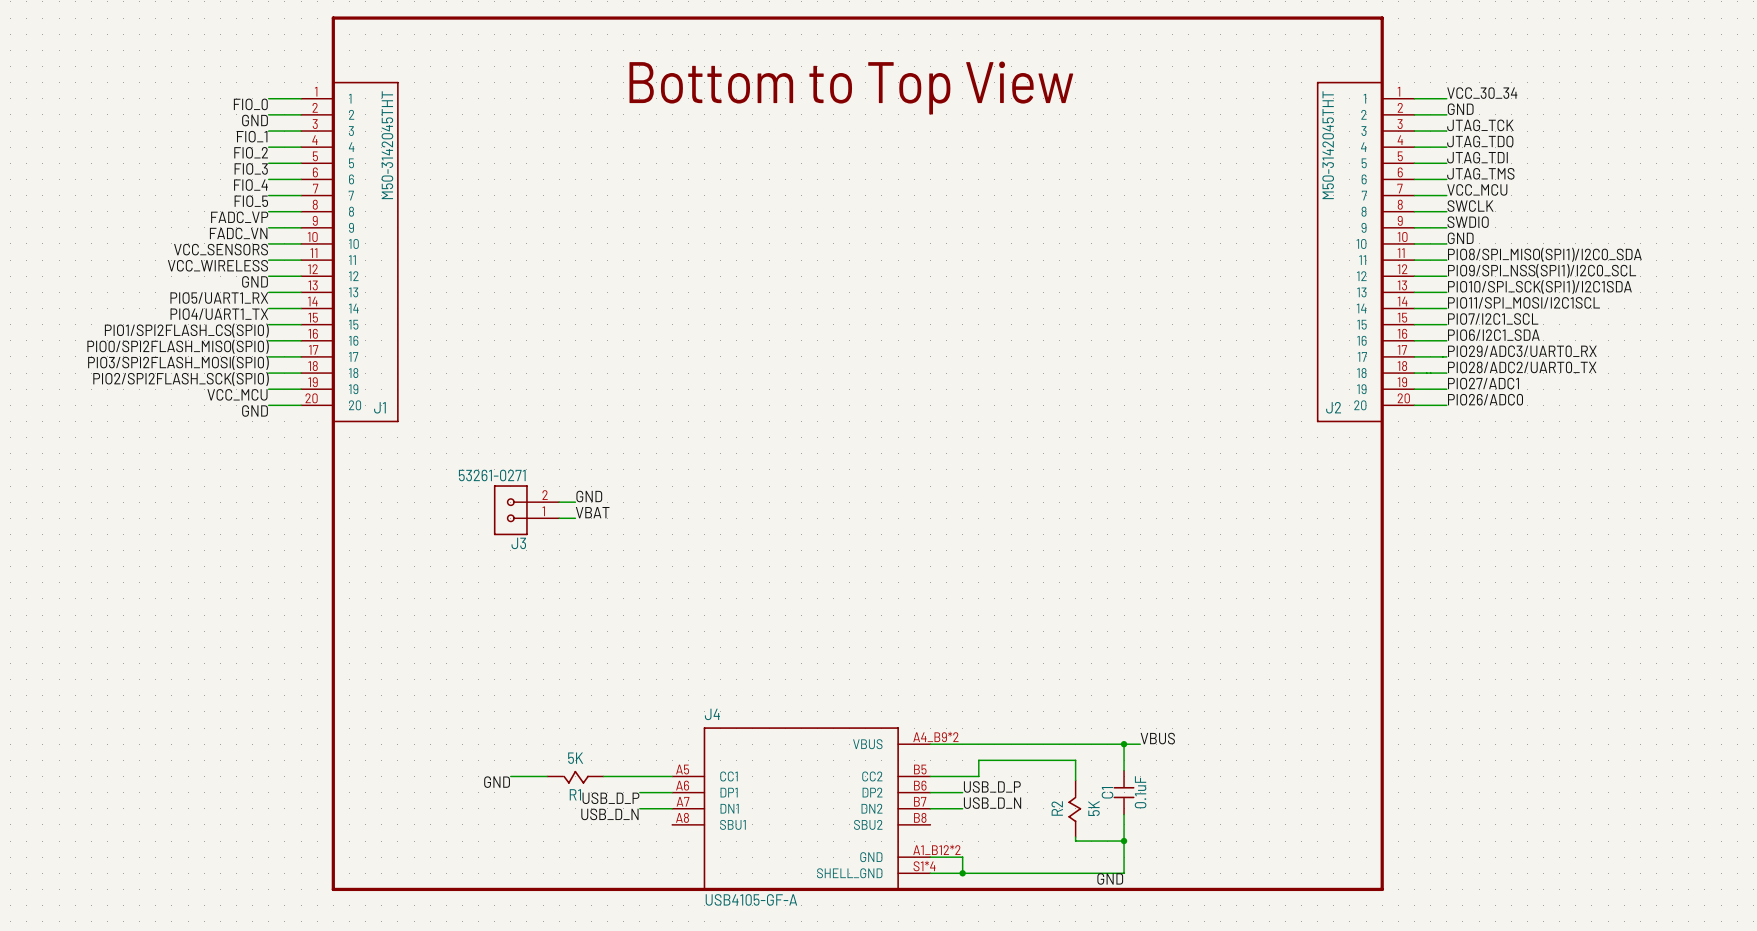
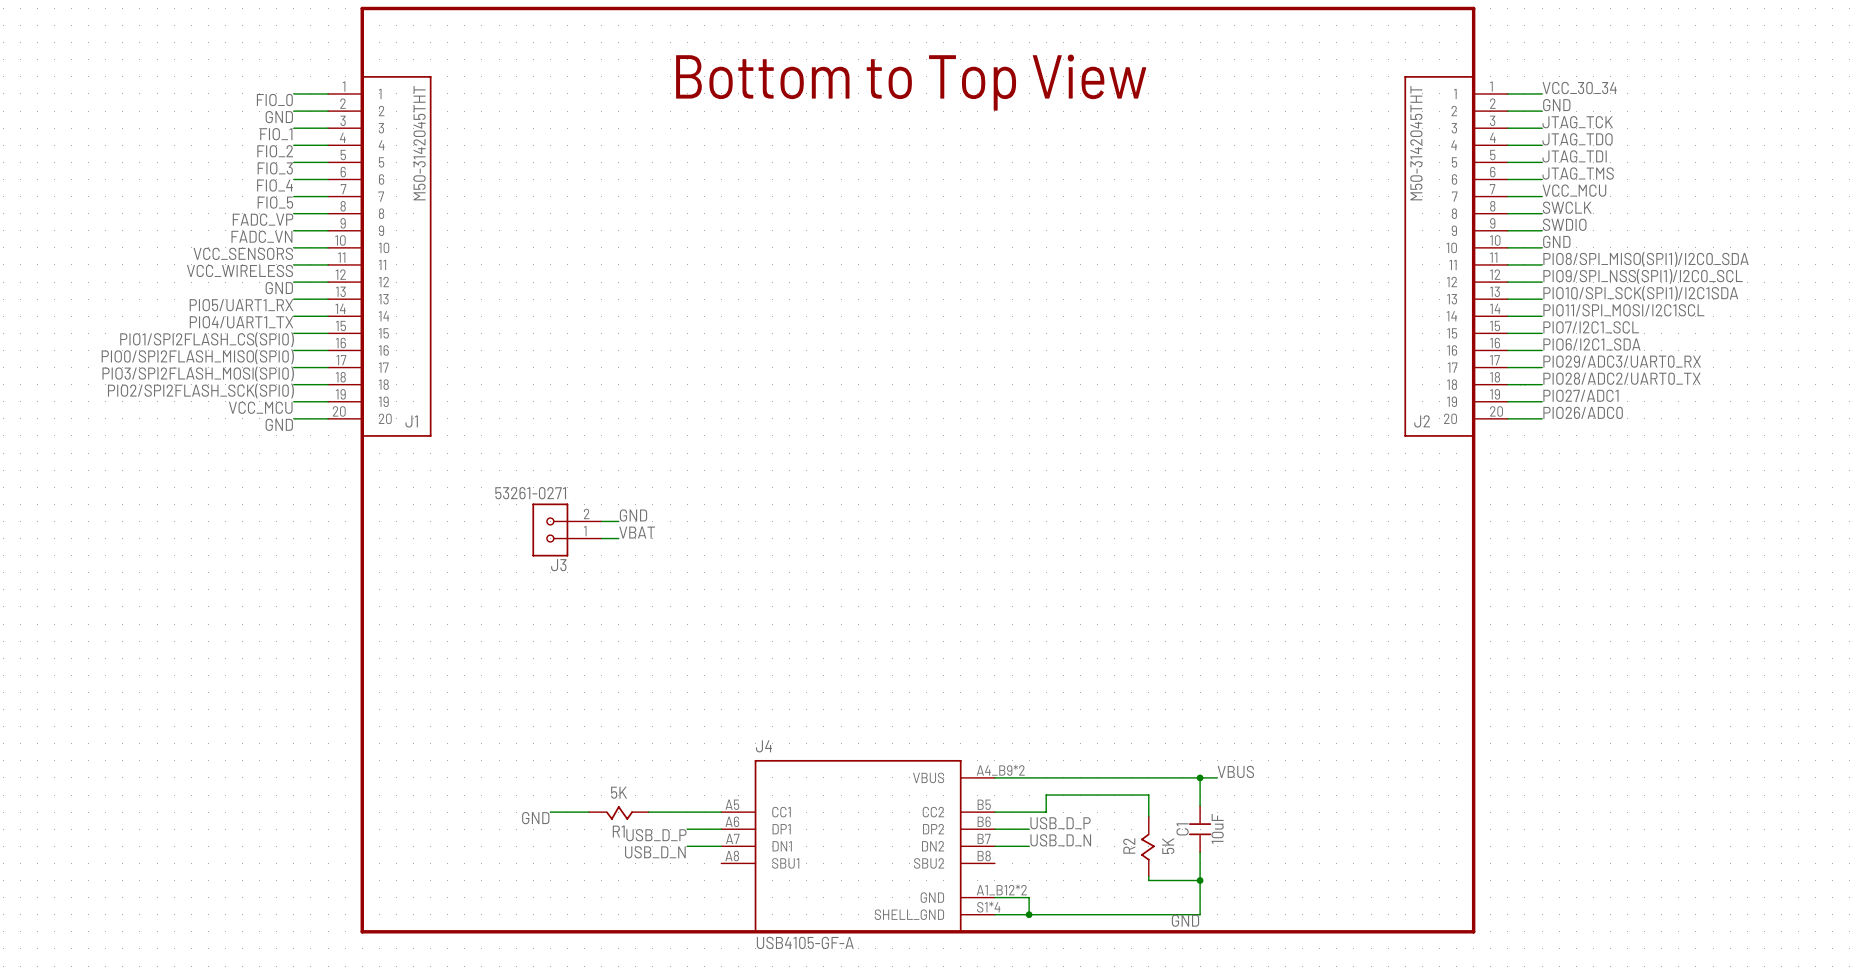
C1 value: 0.1uF (1140, 792) -> 10uF (1217, 828)

